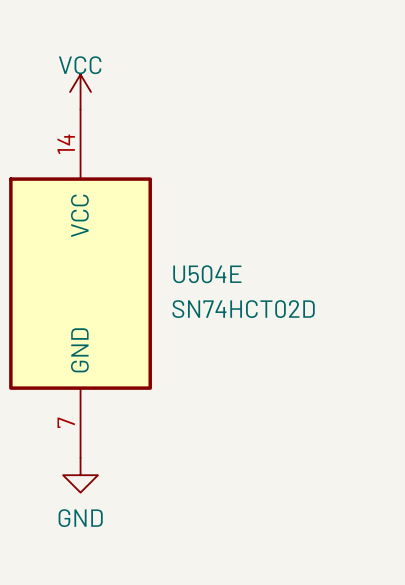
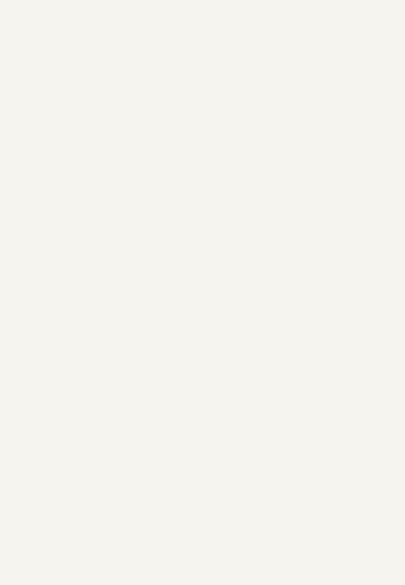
power symbol: VCC (80, 91) -> none
U504E: SN74HCT02D (80, 283) -> none
power symbol: GND (80, 475) -> none

